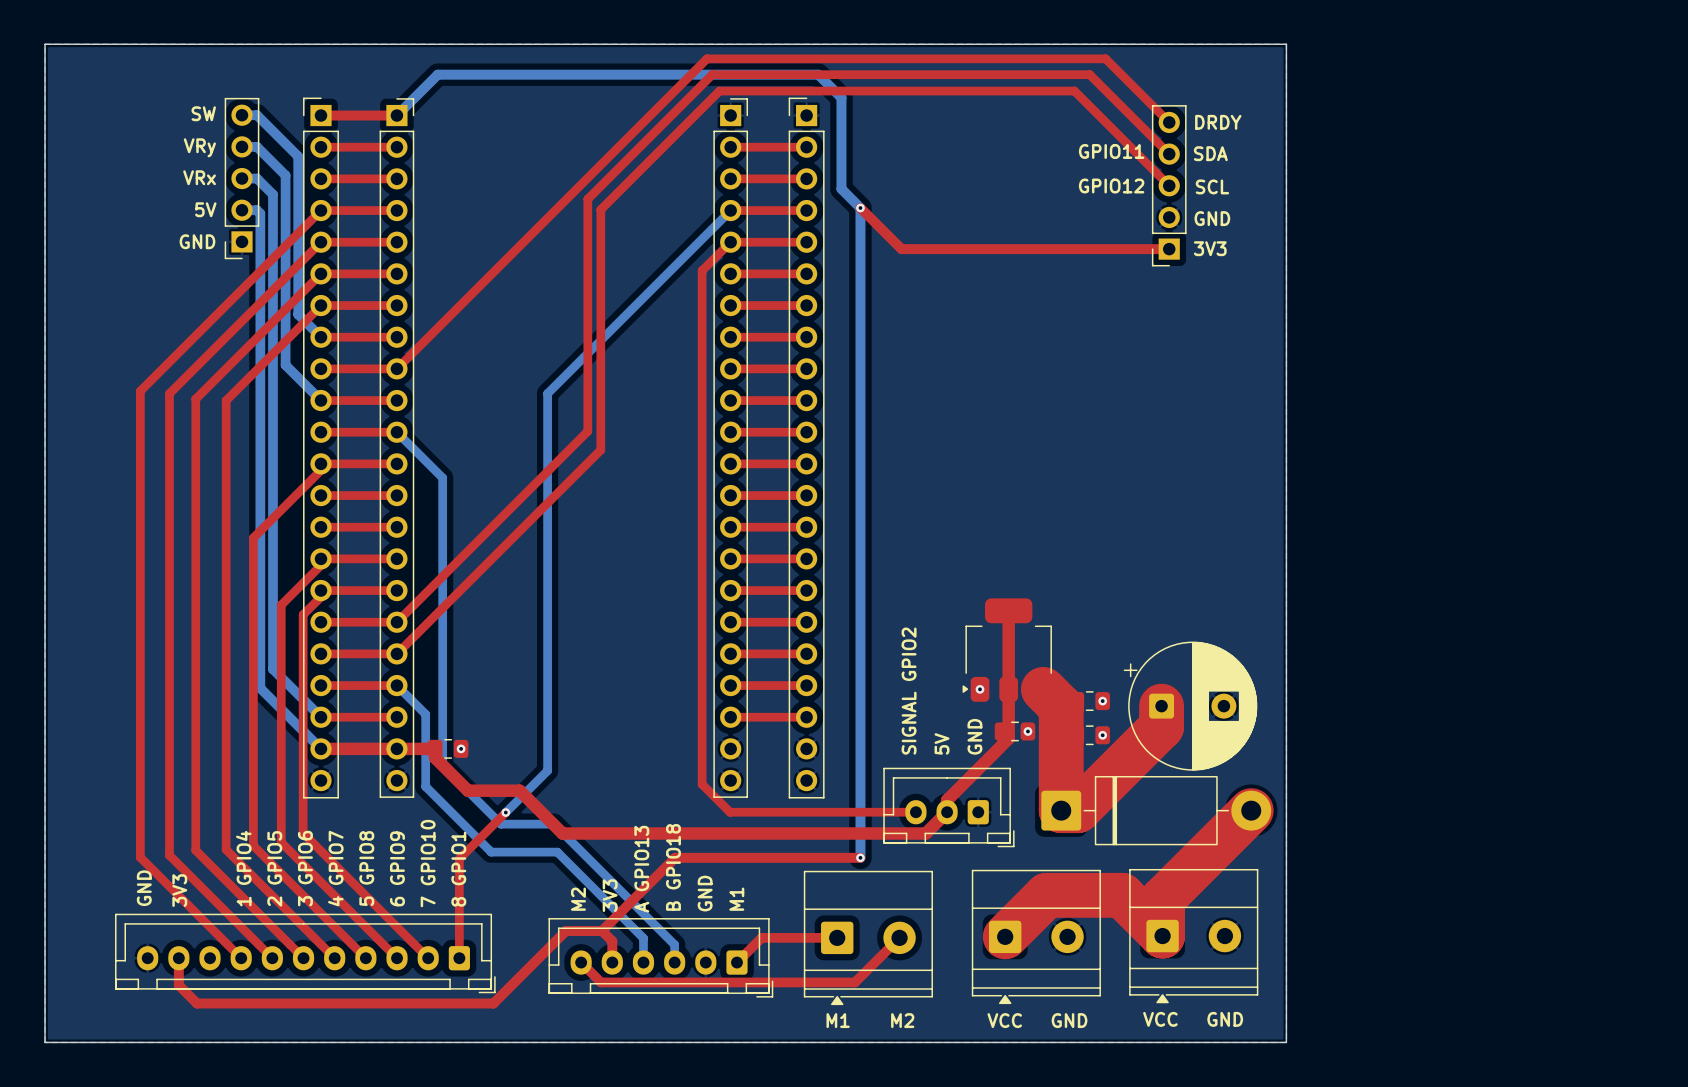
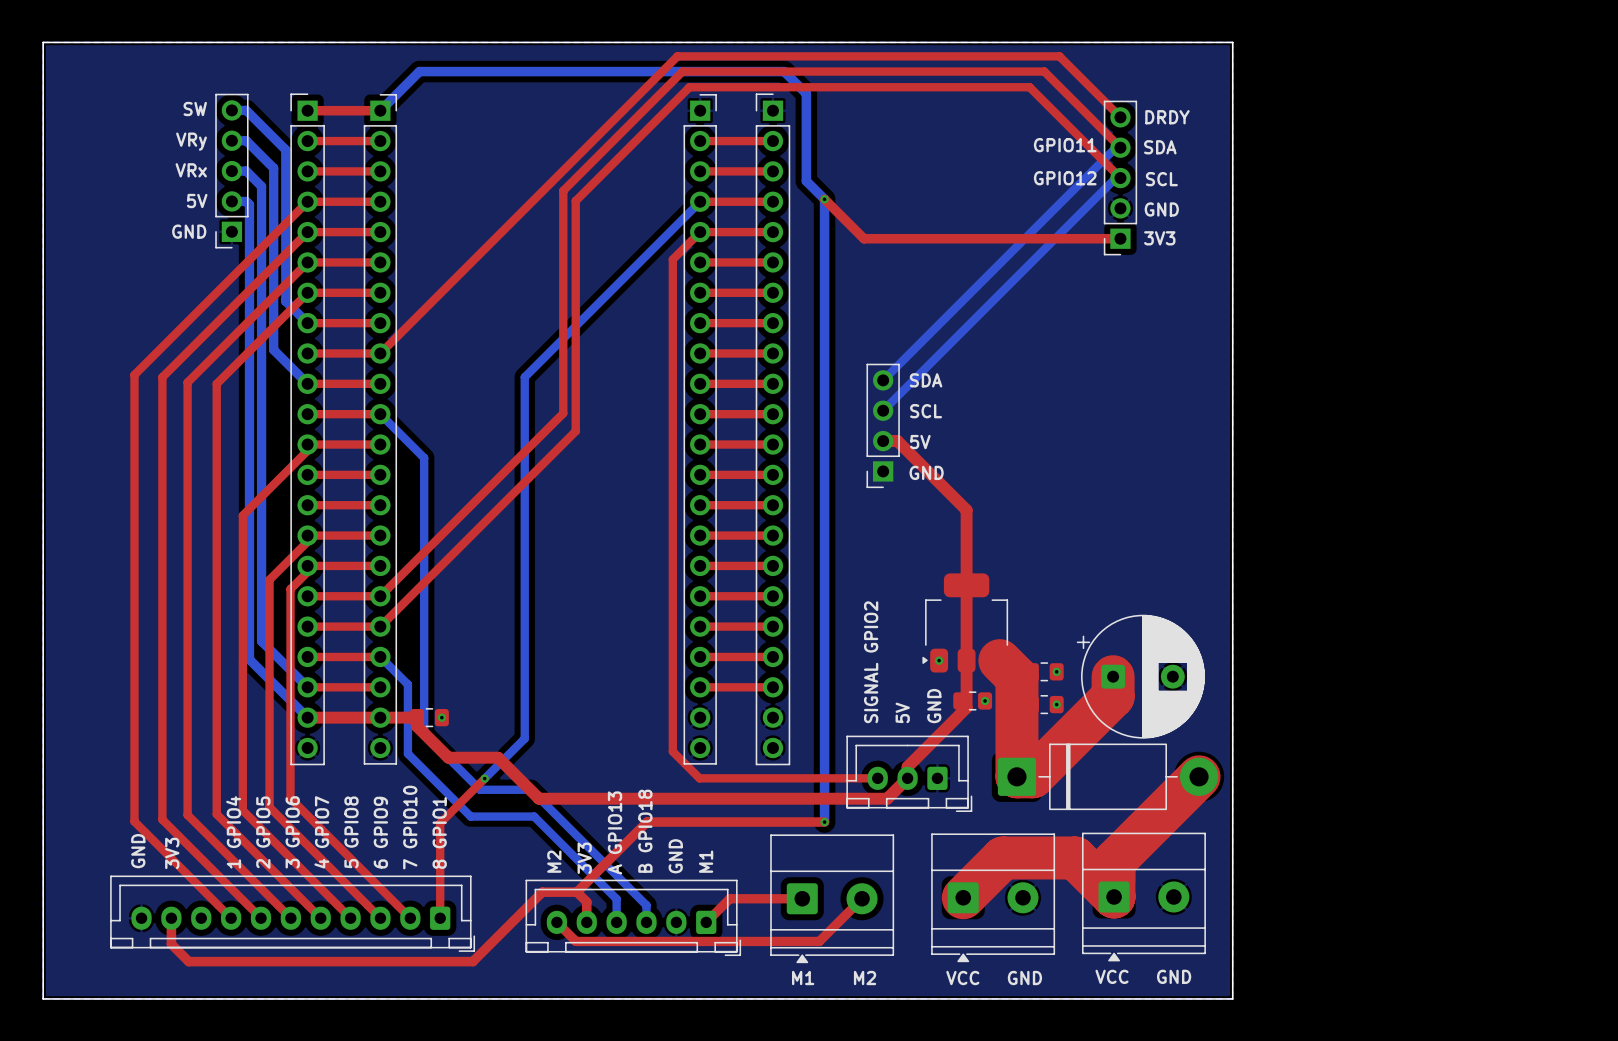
bottom track: none -> (1120, 147) (1115, 147) (883, 380)
bottom track: none -> (1120, 178) (1115, 178) (883, 410)
text: none -> SDA (926, 380)
text: none -> SCL (926, 411)
part: none -> (883, 425)
top track: none -> (883, 441) (897, 441) (966, 510) (966, 585)
text: none -> 5V (920, 442)
text: none -> GND (926, 472)

